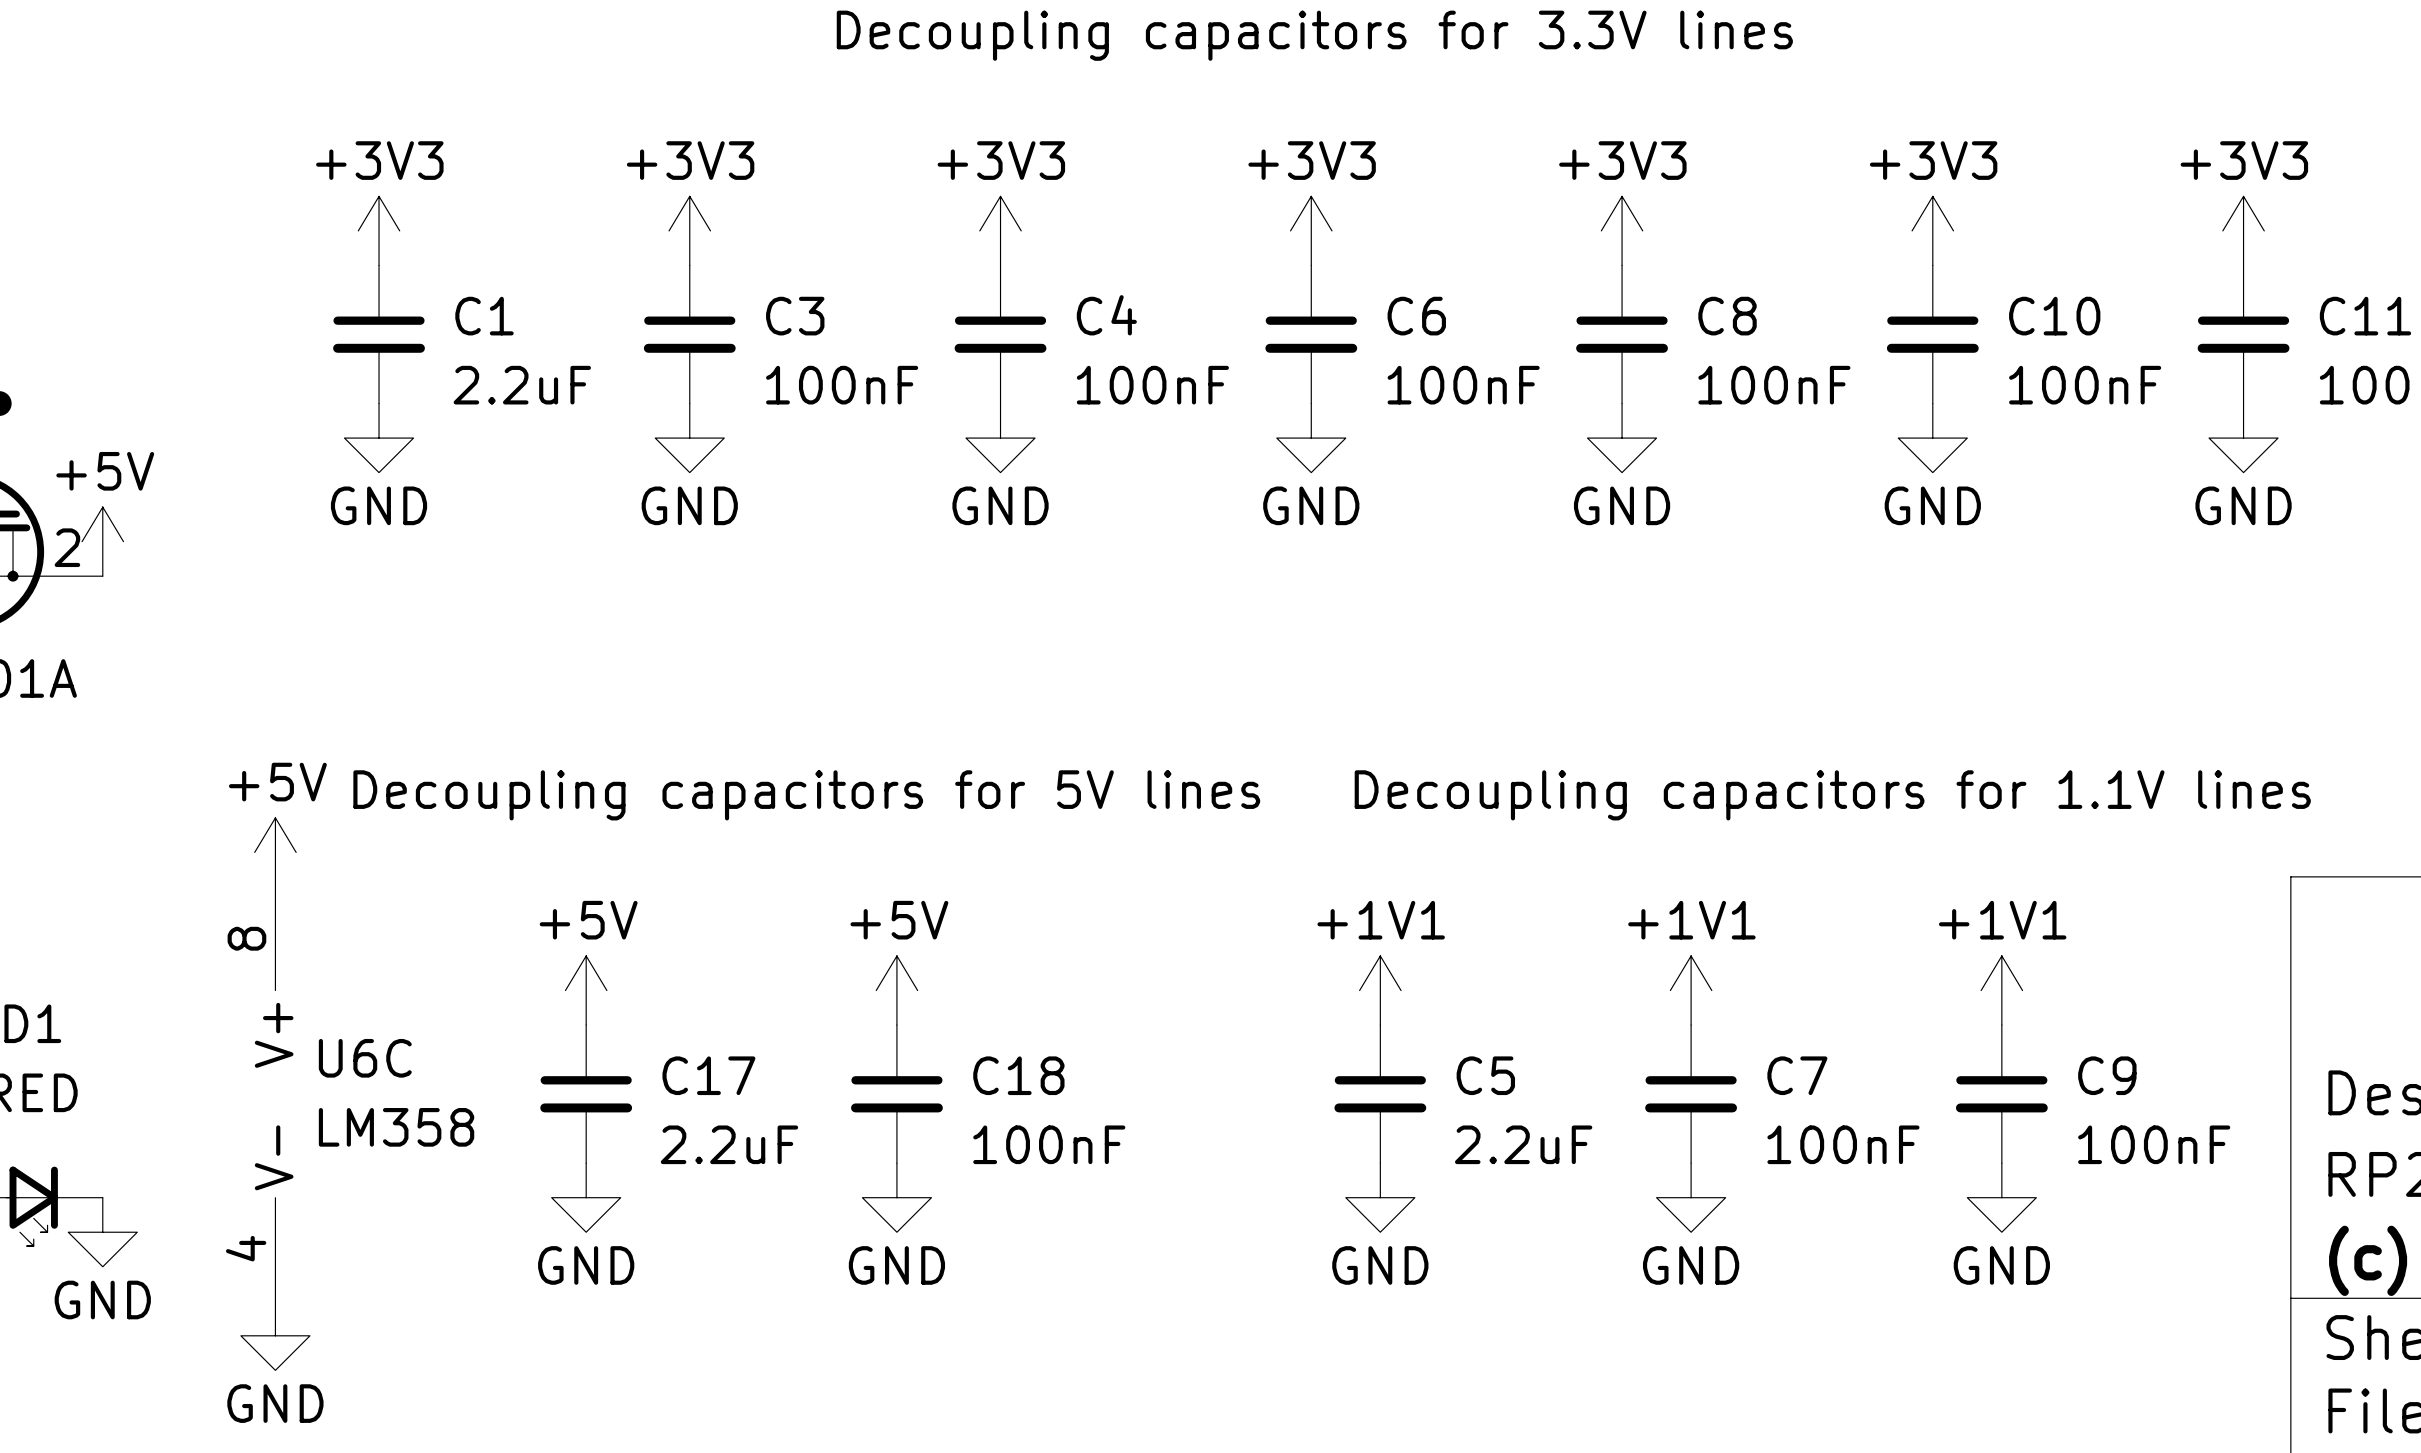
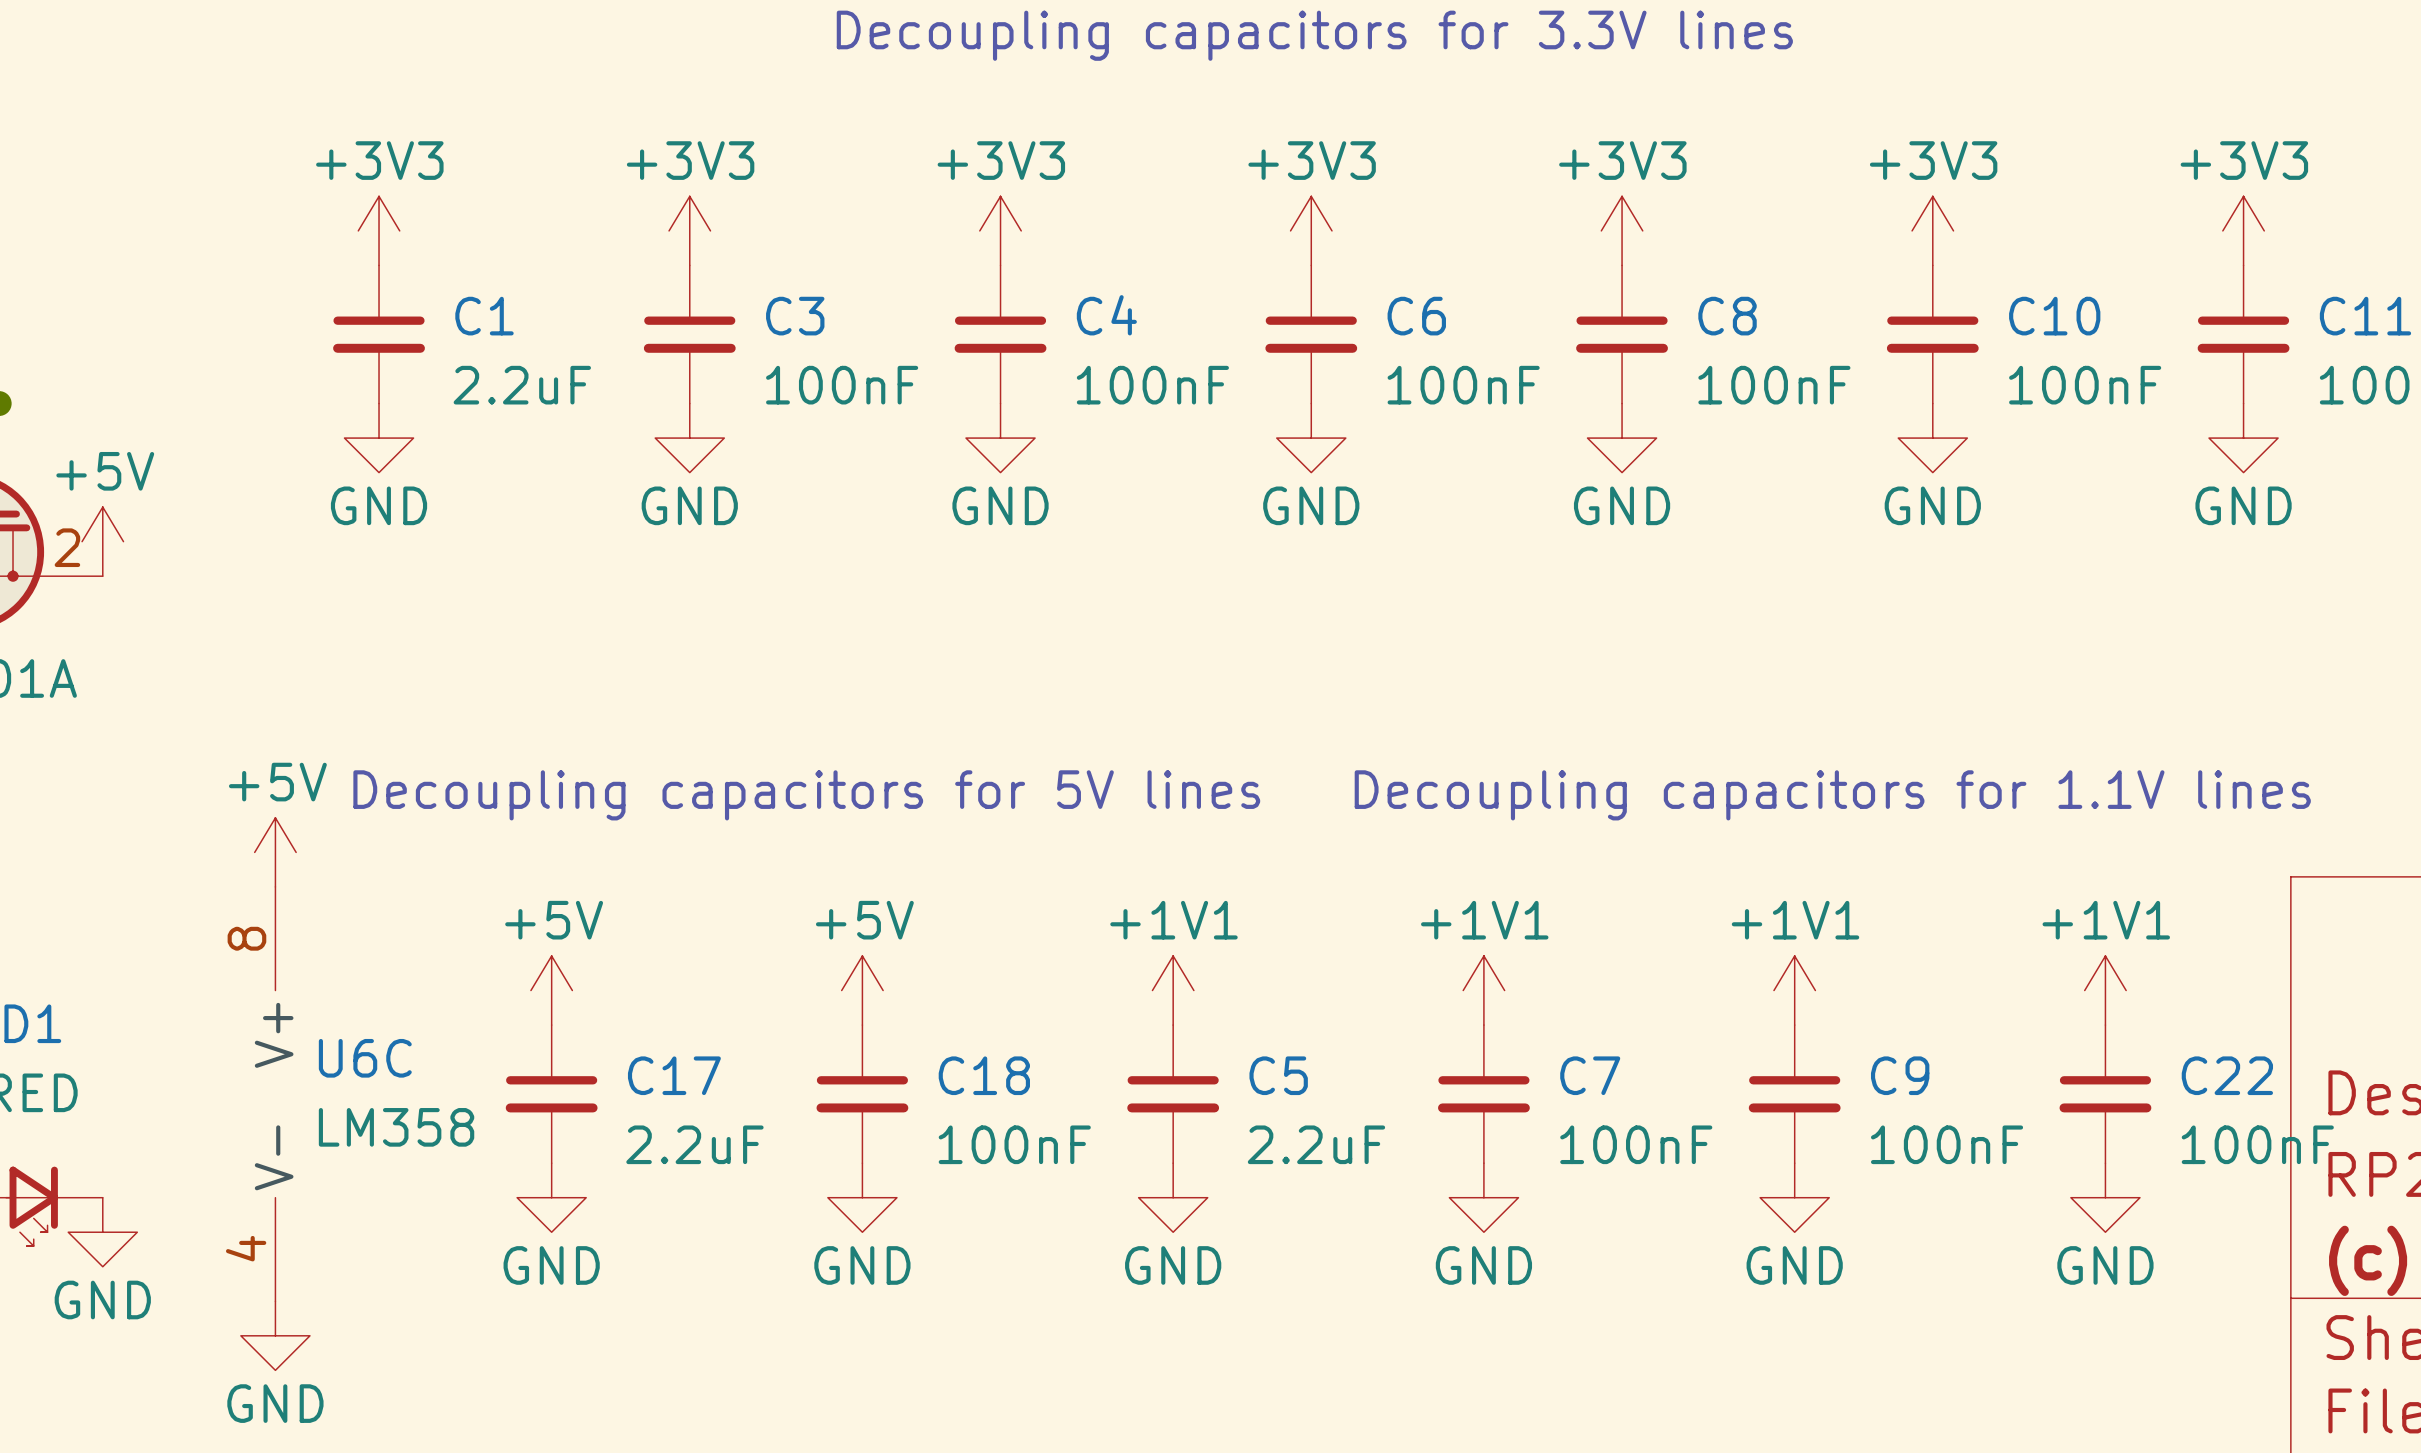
power symbol position: +5V (586, 990) -> +5V (551, 990)
power symbol position: +5V (896, 990) -> +5V (862, 990)
power symbol: none -> +1V1 (1173, 990)
power symbol: +1V1 (1380, 990) -> none
power symbol: none -> +1V1 (1483, 990)
power symbol: +1V1 (1691, 990) -> none
power symbol: none -> +1V1 (1794, 990)
power symbol: +1V1 (2001, 990) -> none
power symbol: none -> +1V1 (2105, 990)
C17 position: (586, 1094) -> (551, 1094)
C18 position: (896, 1094) -> (862, 1094)
C5 position: (1380, 1094) -> (1173, 1094)
C7 position: (1691, 1094) -> (1483, 1094)
C9 position: (2001, 1094) -> (1794, 1094)
C22: none -> 100nF (2105, 1094)
power symbol position: GND (586, 1197) -> GND (551, 1197)
power symbol position: GND (896, 1197) -> GND (862, 1197)
power symbol: none -> GND (1173, 1197)
power symbol: GND (1380, 1197) -> none
power symbol: none -> GND (1483, 1197)
power symbol: GND (1691, 1197) -> none
power symbol: none -> GND (1794, 1197)
power symbol: GND (2001, 1197) -> none
power symbol: none -> GND (2105, 1197)

